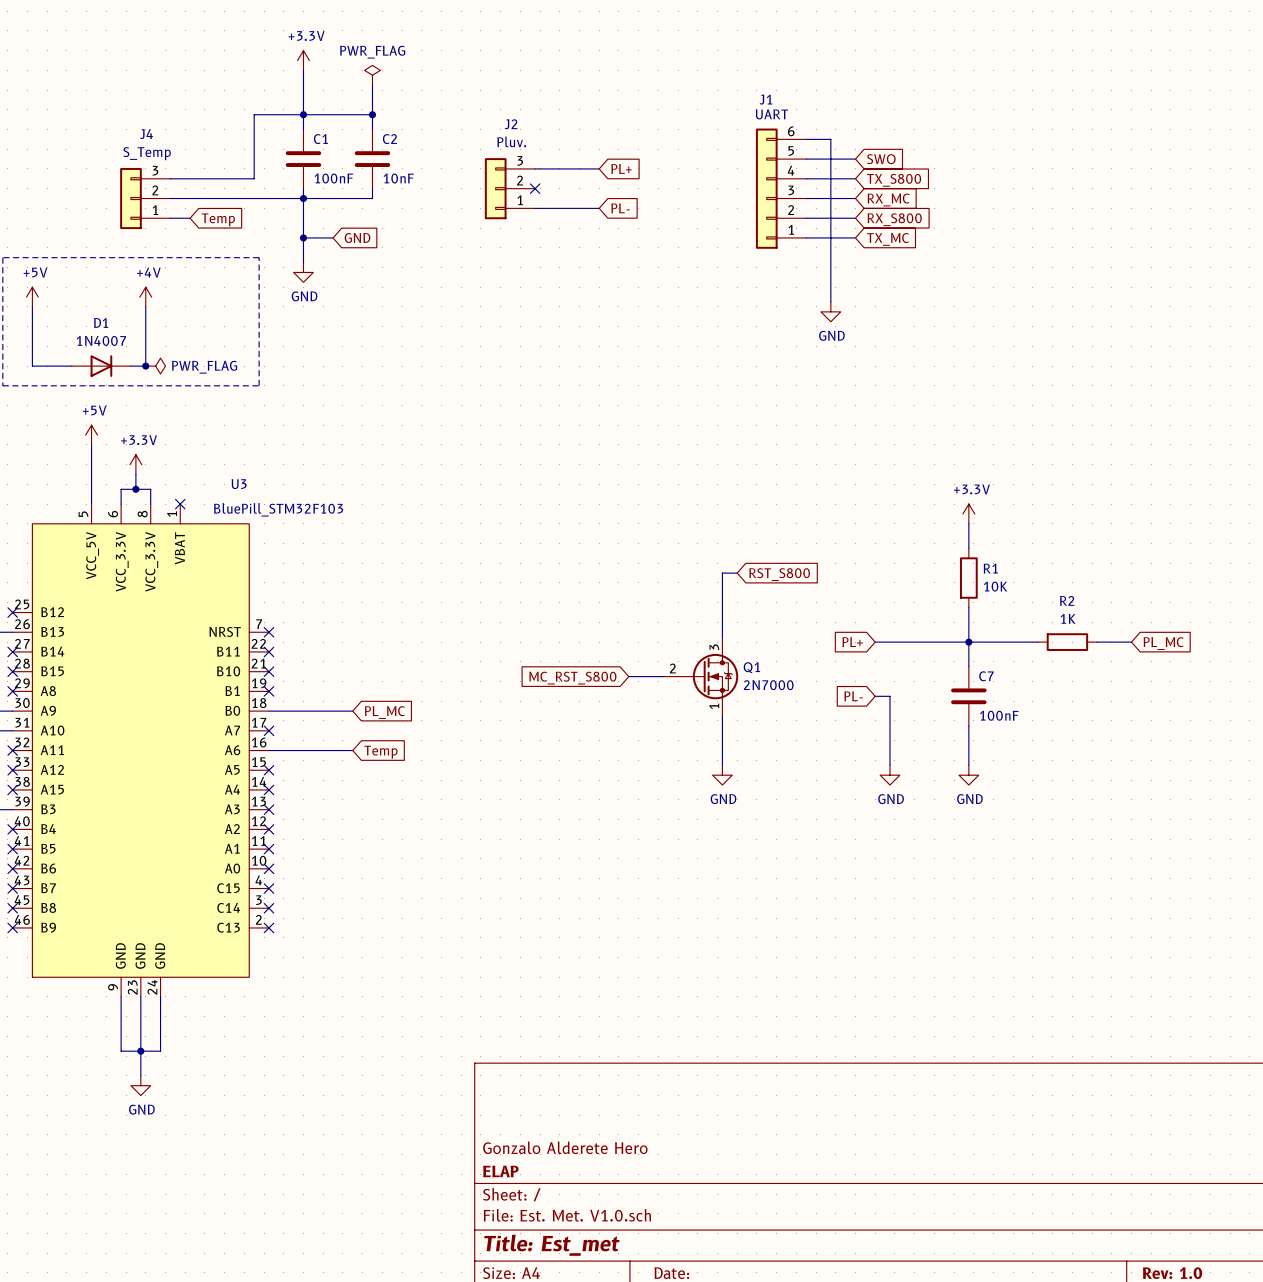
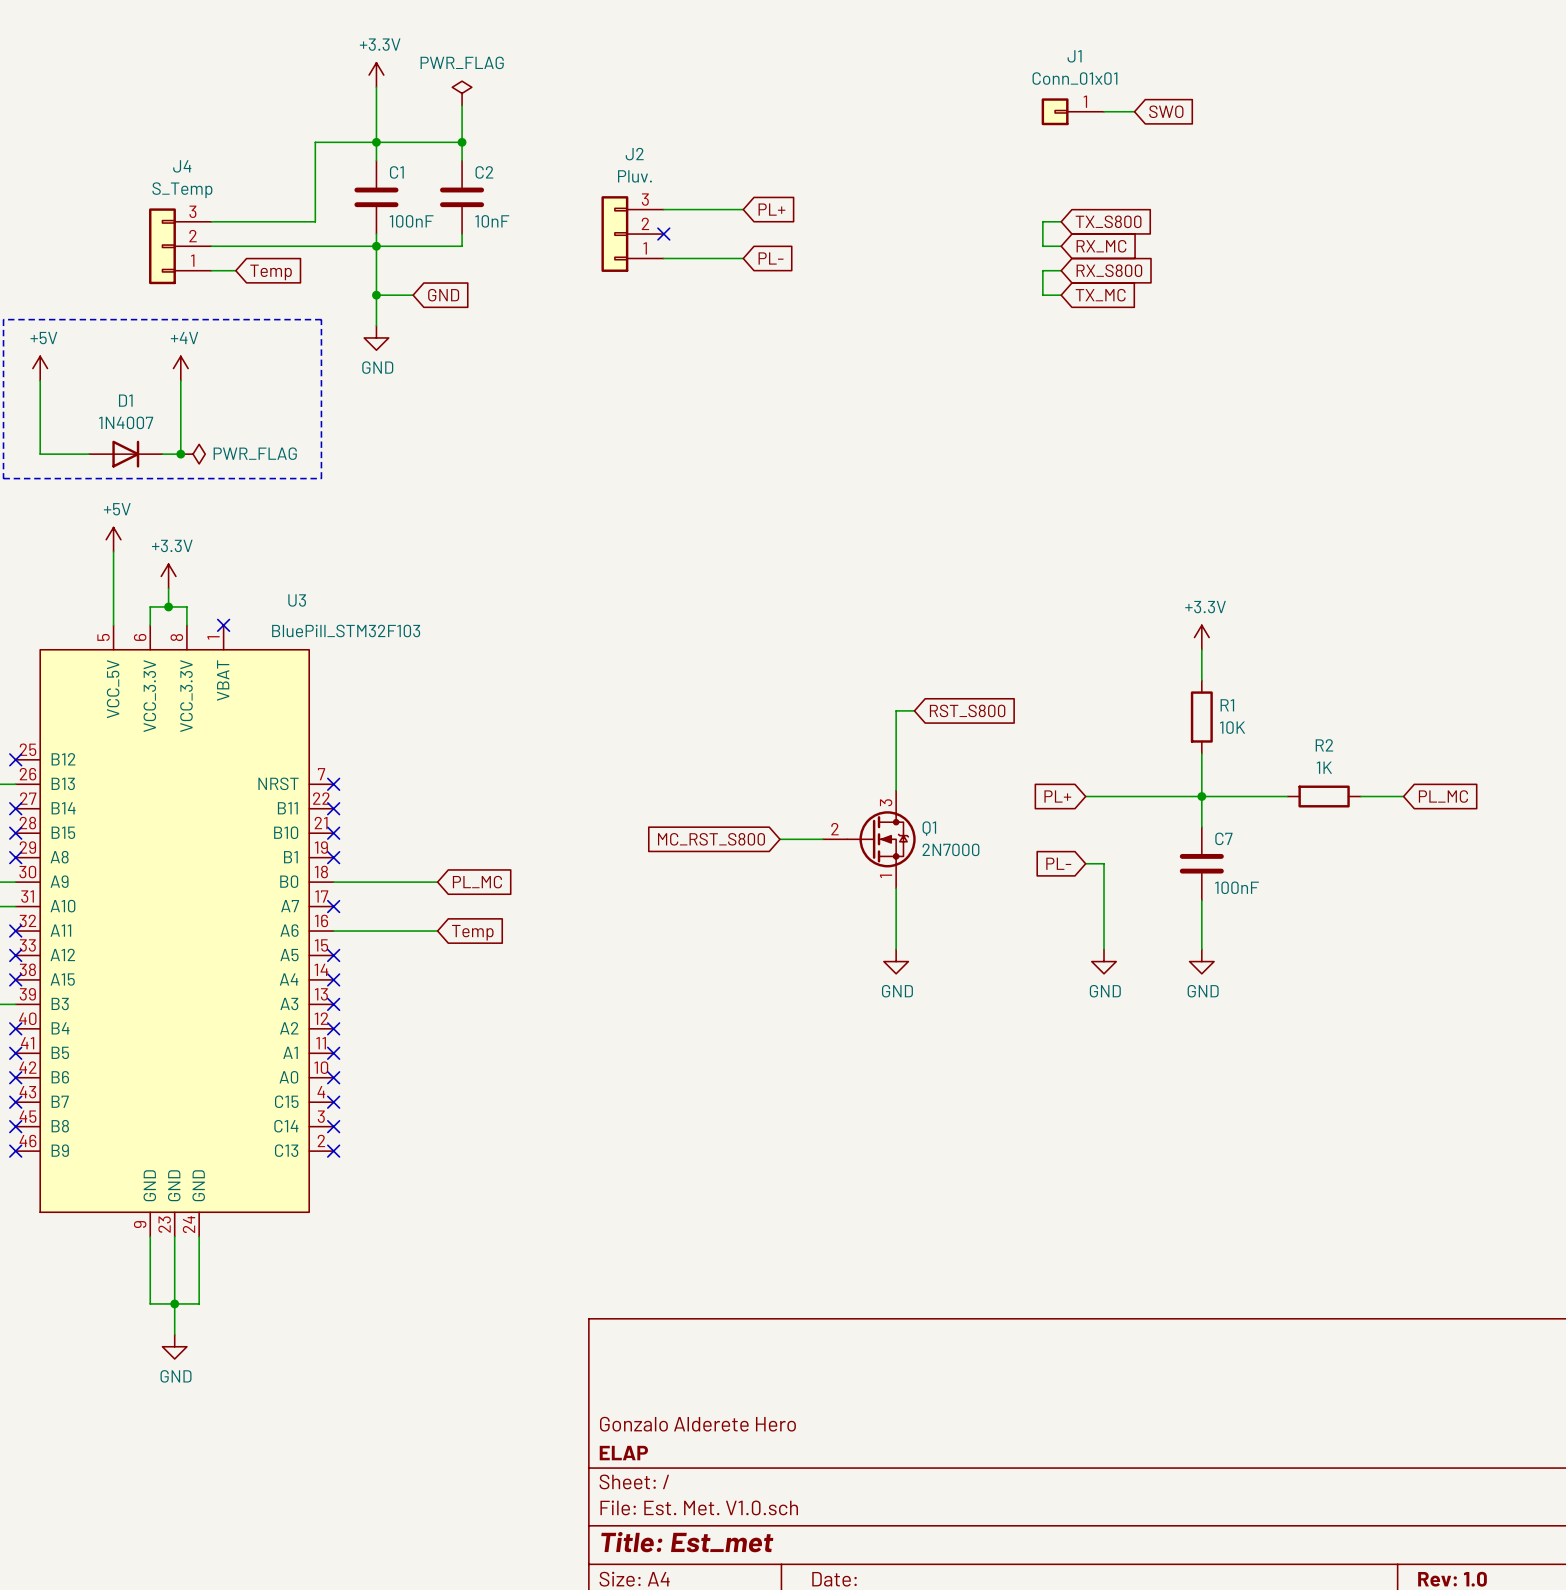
wire: none -> (1104, 111) (1134, 111)
J1 name position: J1 (765, 99) -> J1 (1074, 56)
J1 value: UART (771, 114) -> Conn_01x01 (1074, 78)
J1 symbol: [755, 128, 807, 249] -> [1041, 98, 1105, 126]
wire: (806, 139) (830, 139) (830, 302) -> none
wire: (806, 159) (855, 159) -> none
global label position: SWO (881, 159) -> SWO (1166, 111)
wire: (806, 178) (840, 178) -> (1042, 246) (1042, 221)
wire: (806, 198) (840, 198) -> none
wire: (806, 218) (840, 218) -> (1042, 295) (1042, 270)
wire: (806, 237) (840, 237) -> none
power symbol: GND (830, 311) -> none

